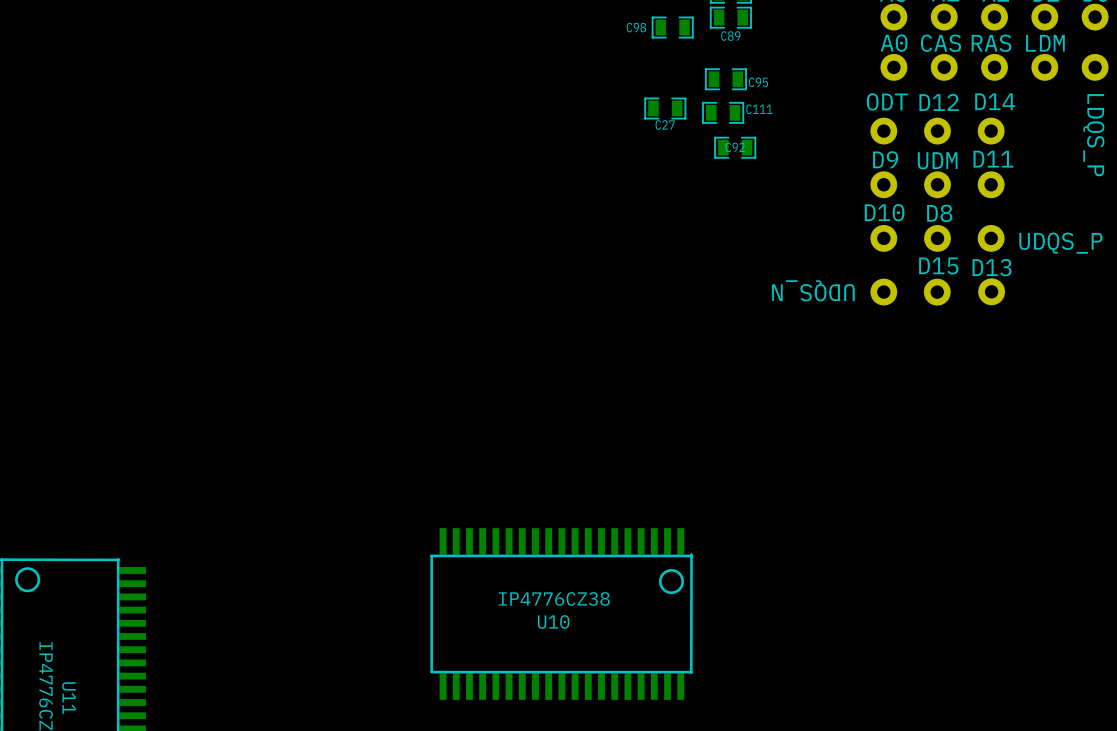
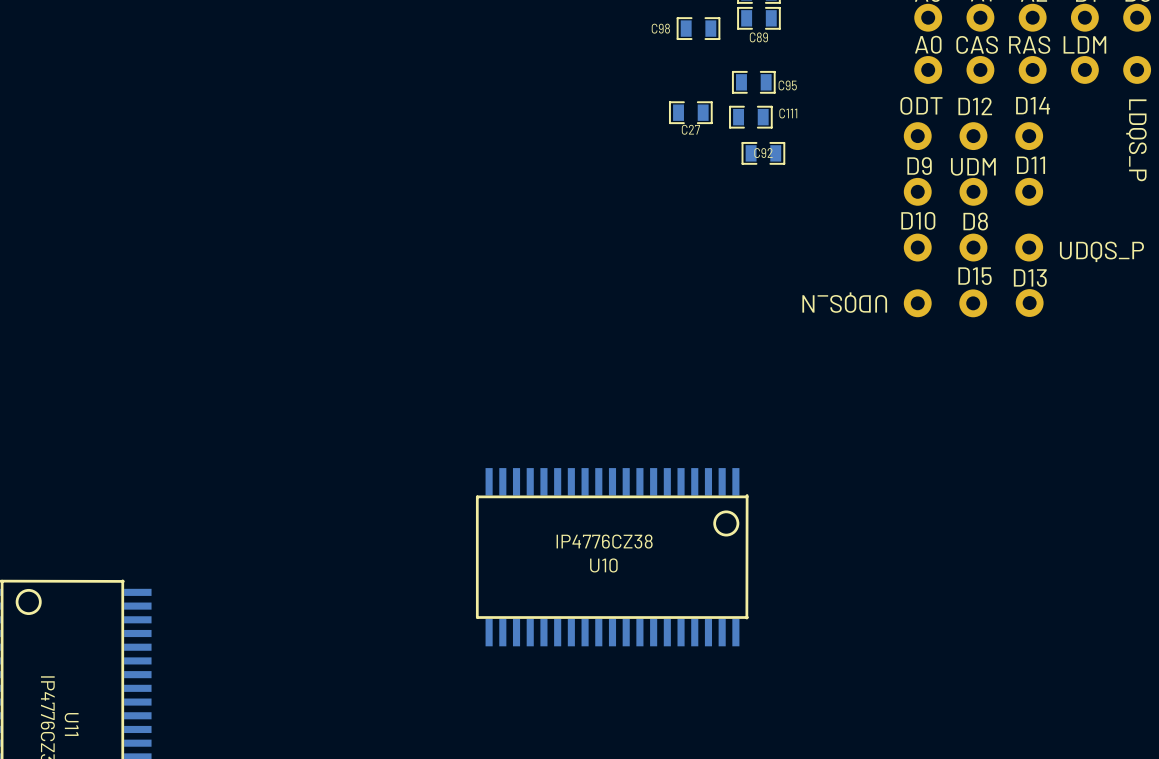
U10 position: (561, 614) -> (612, 557)

